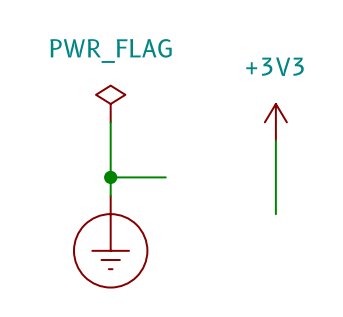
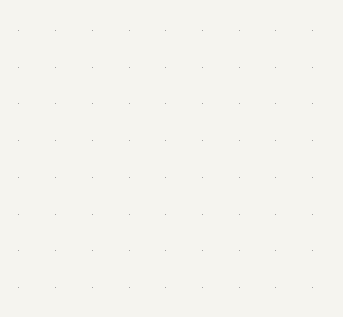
power symbol: PWR_FLAG (110, 103) -> none
wire: (110, 122) (110, 195) -> none
power symbol: +3V3 (275, 122) -> none
wire: (275, 140) (275, 214) -> none
wire: (110, 177) (165, 177) -> none
junction: (110, 177) -> none
power symbol: (110, 241) -> none

